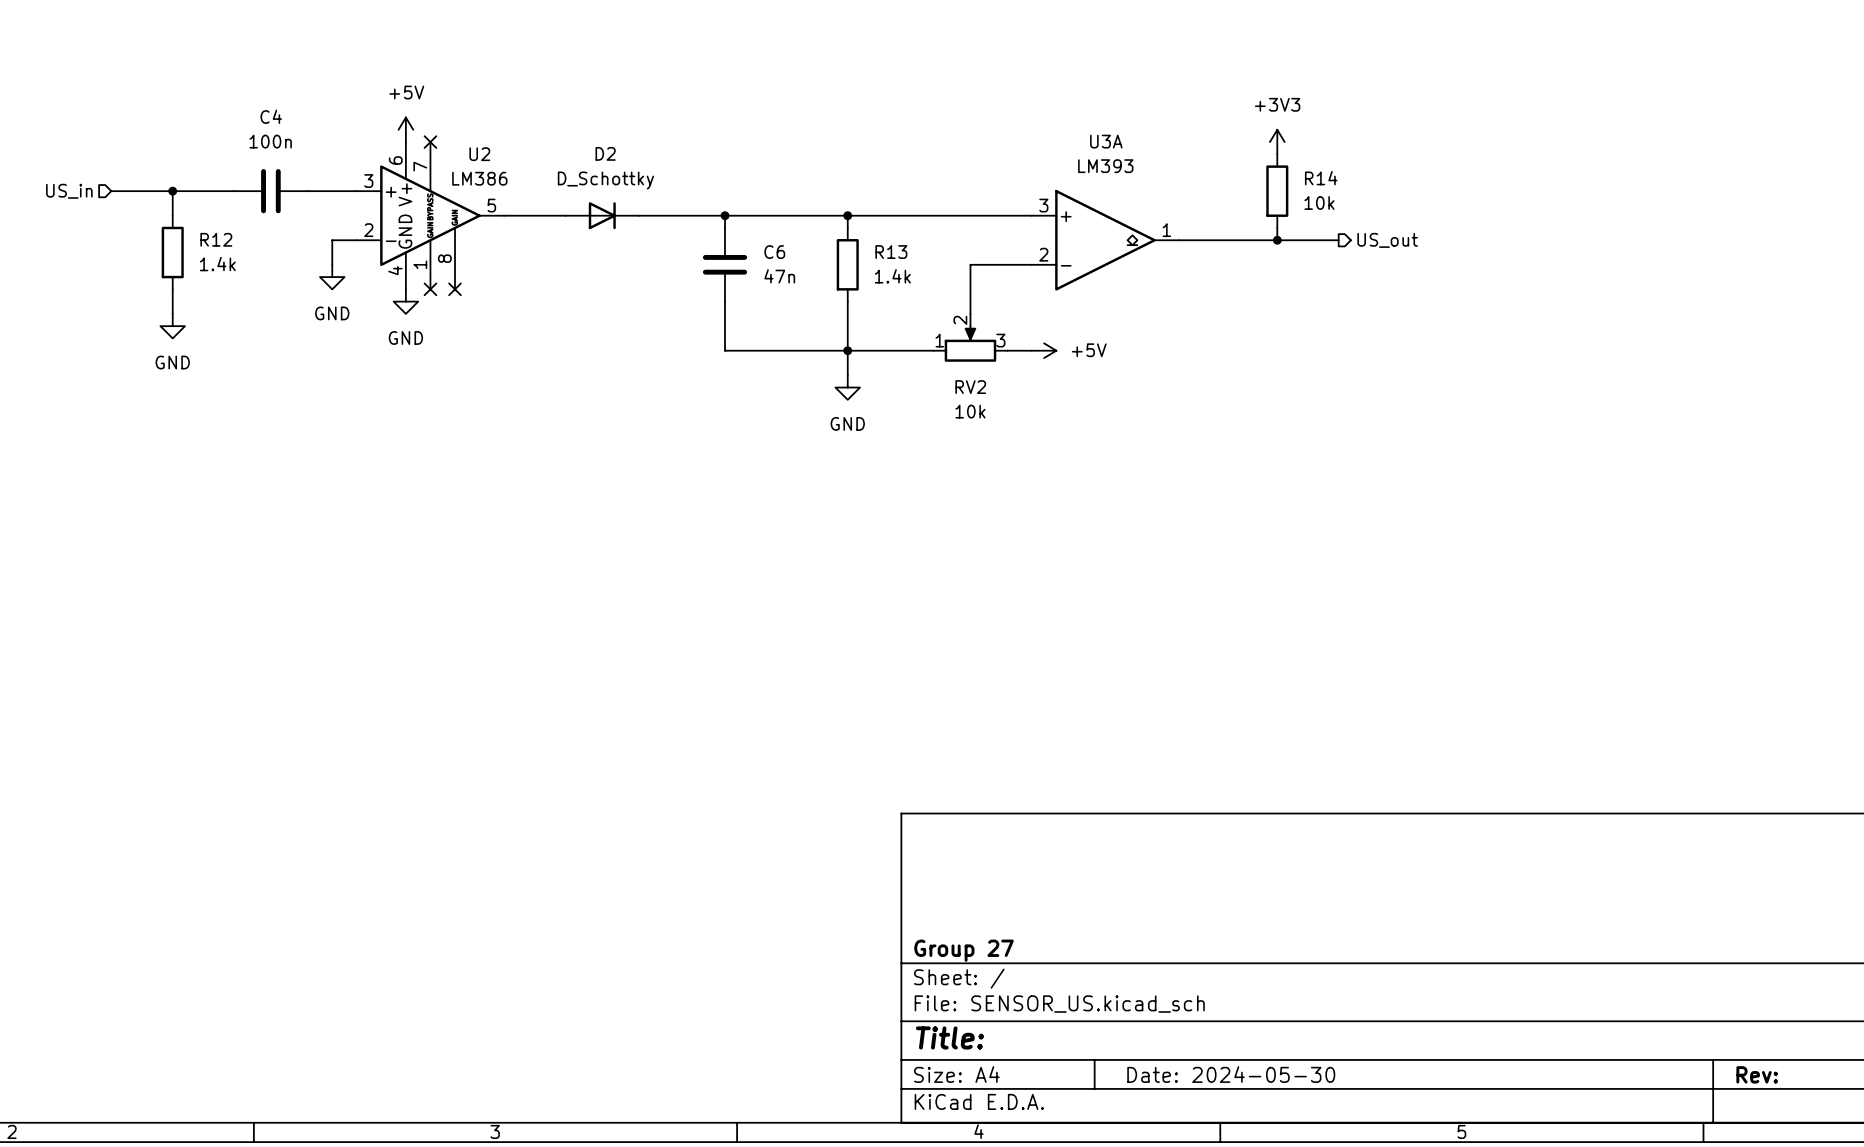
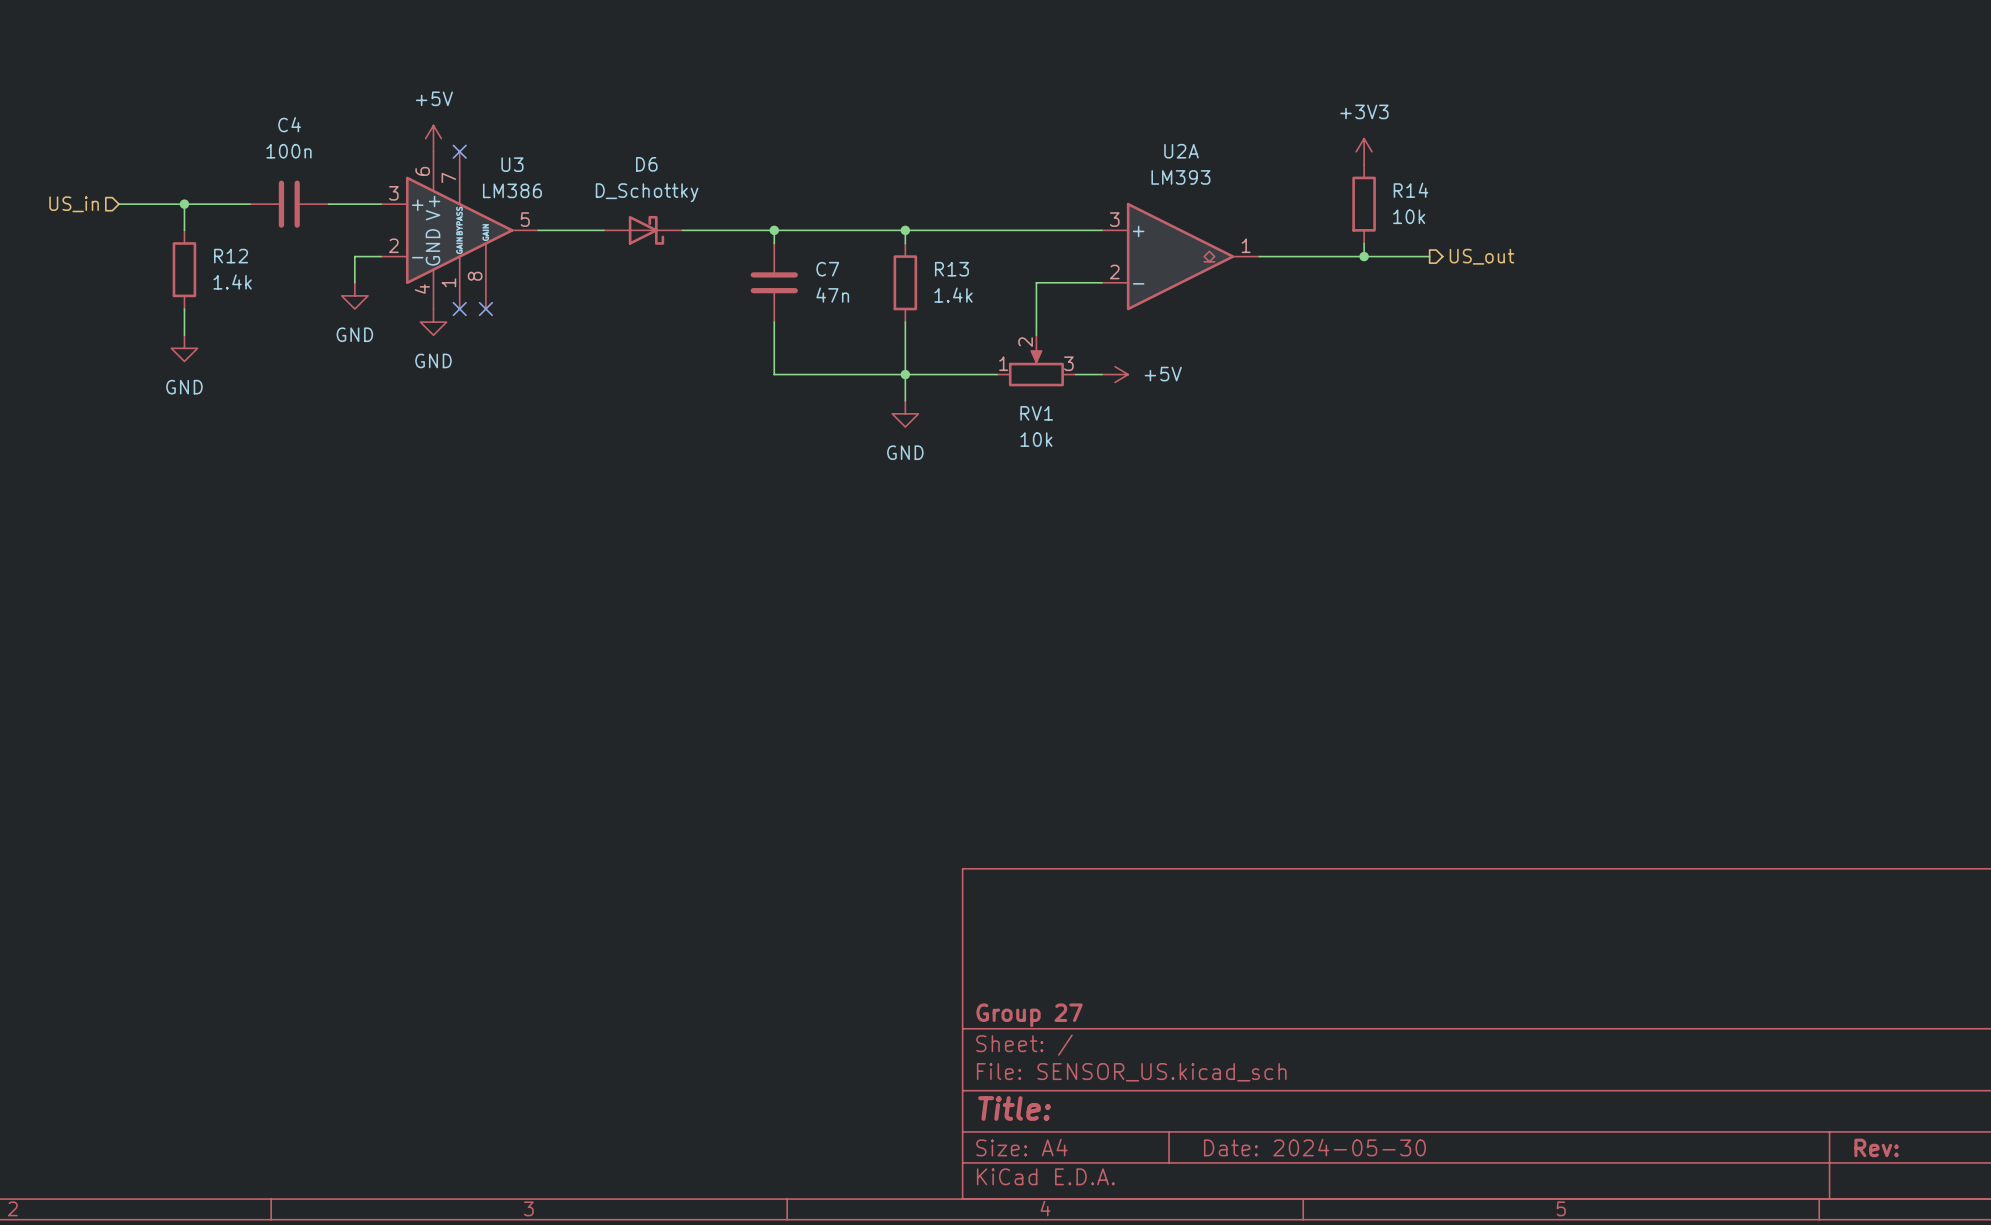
U3A name: U3A (1106, 141) -> U2A (1181, 151)
U2 name: U2 (479, 154) -> U3 (512, 164)
D2: D_Schottky (602, 215) -> none
D6: none -> D_Schottky (643, 230)
C6 name: C6 (774, 252) -> C7 (827, 269)
RV2 name: RV2 (970, 387) -> RV1 (1036, 413)

